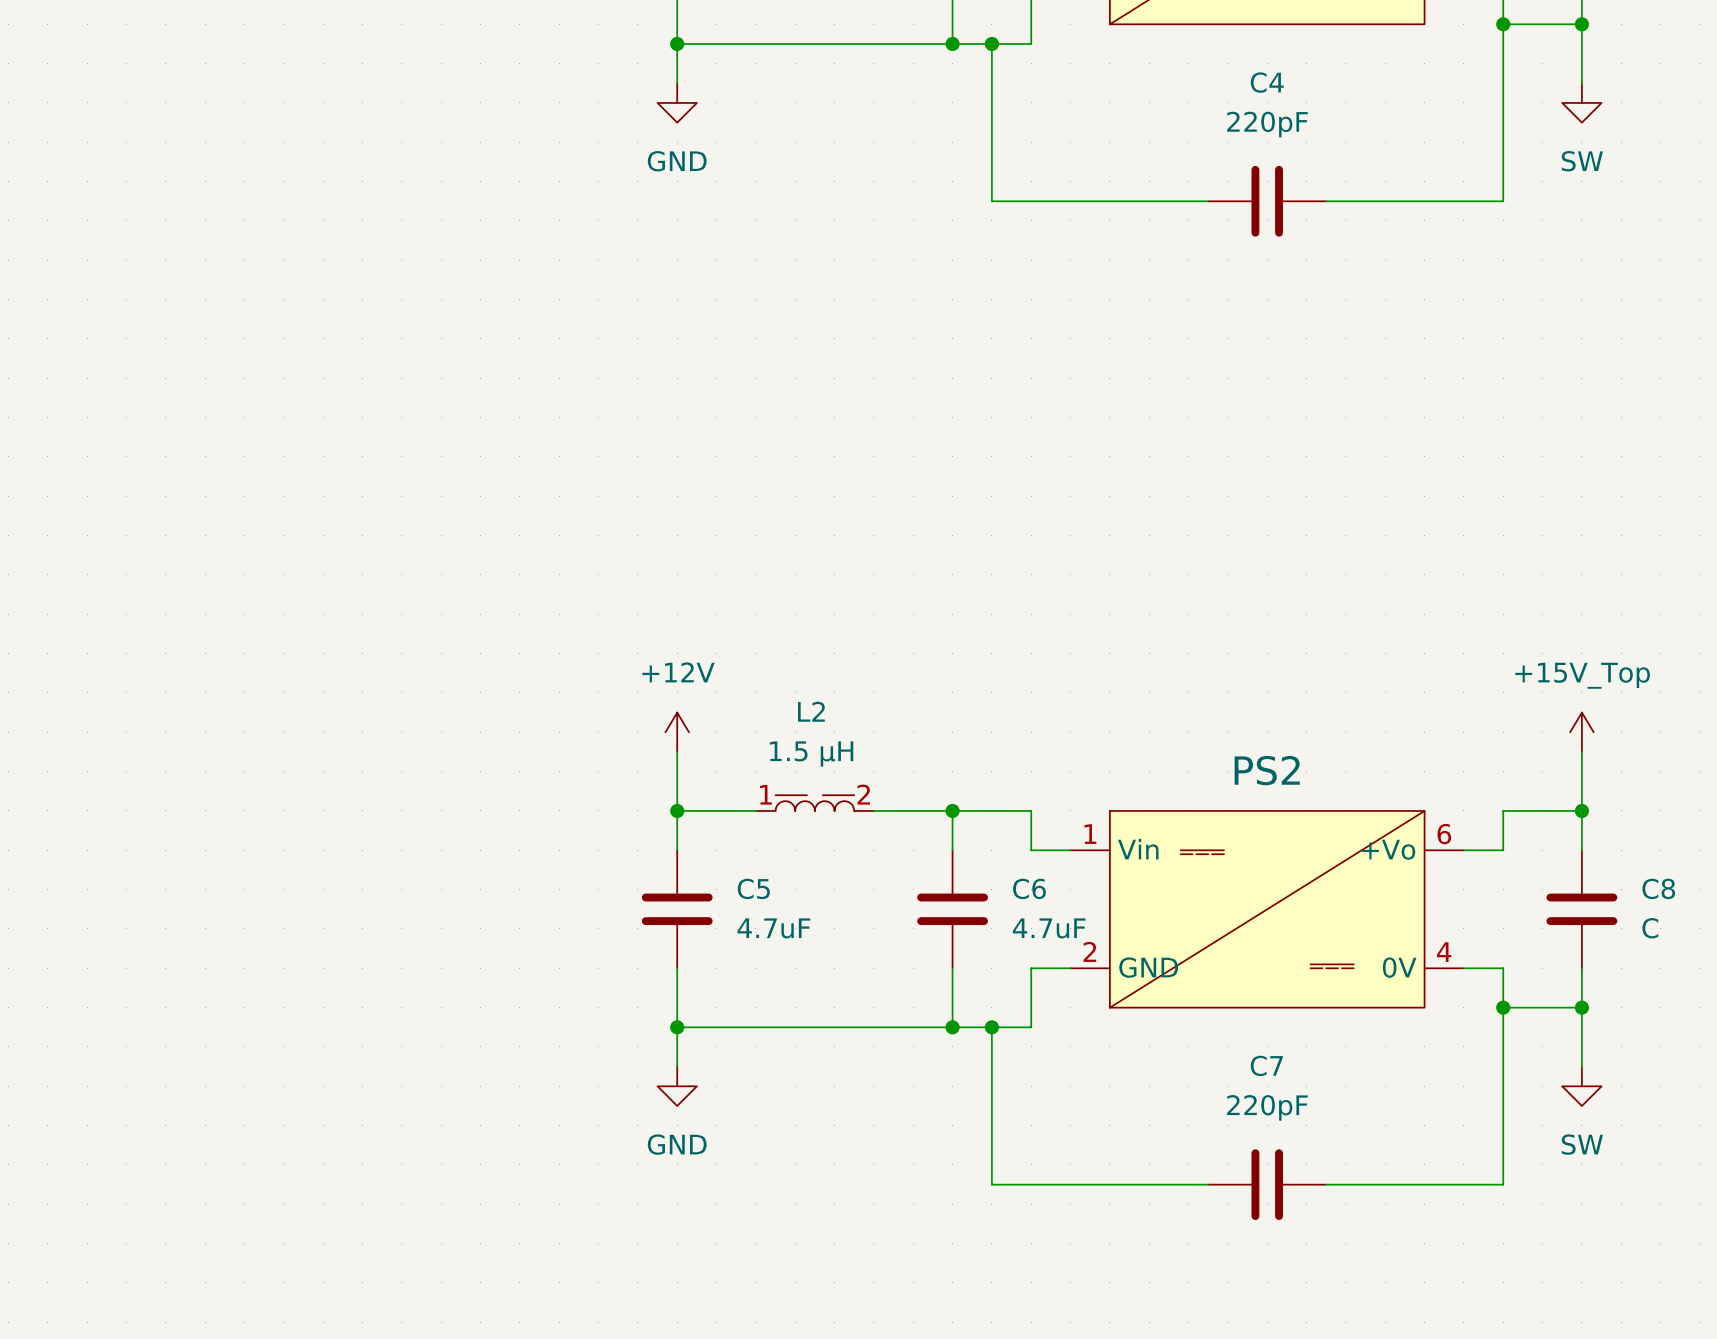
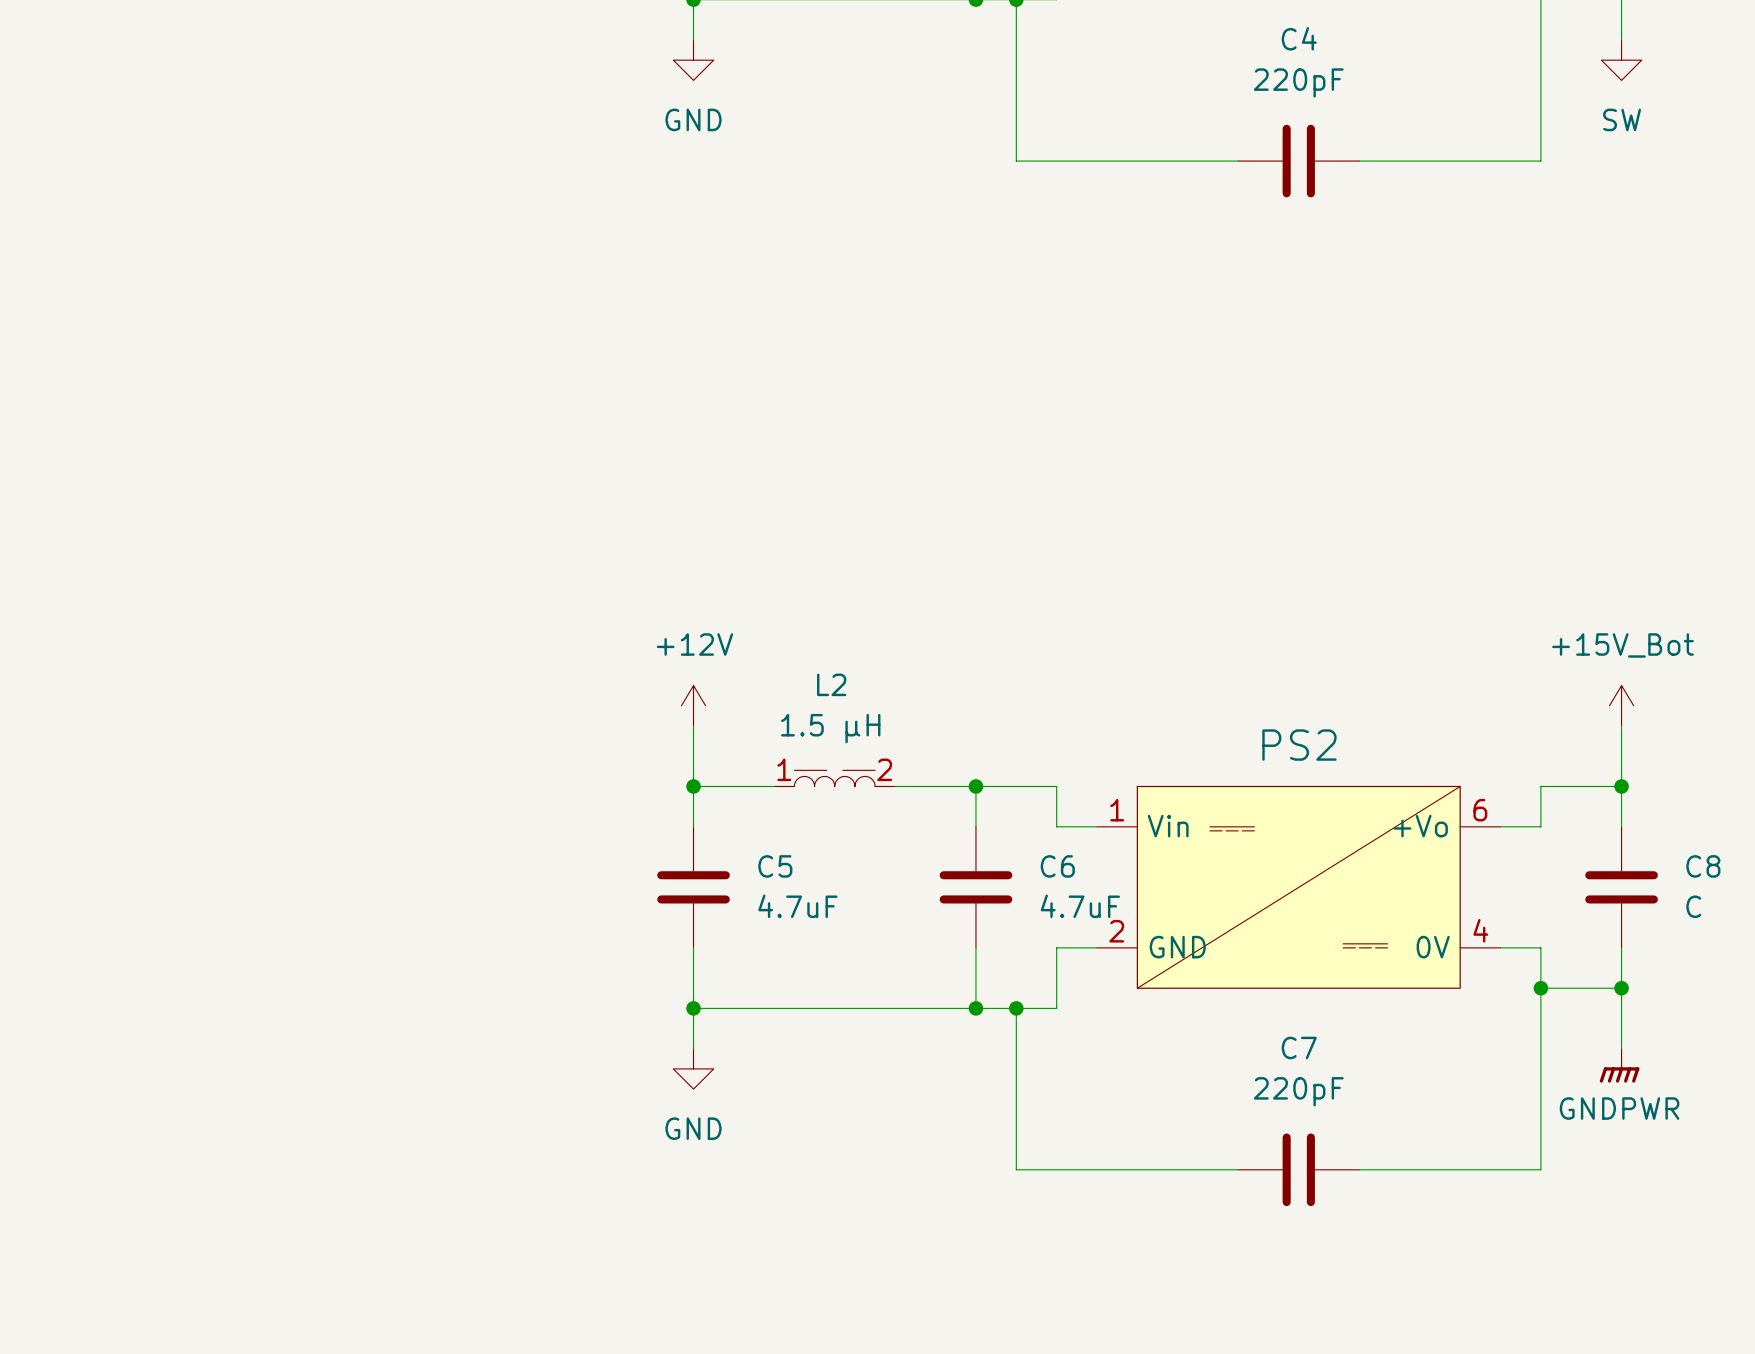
power symbol: +15V_Top (1581, 732) -> +15V_Bot (1621, 705)
power symbol: SW (1581, 1086) -> GNDPWR (1619, 1065)

